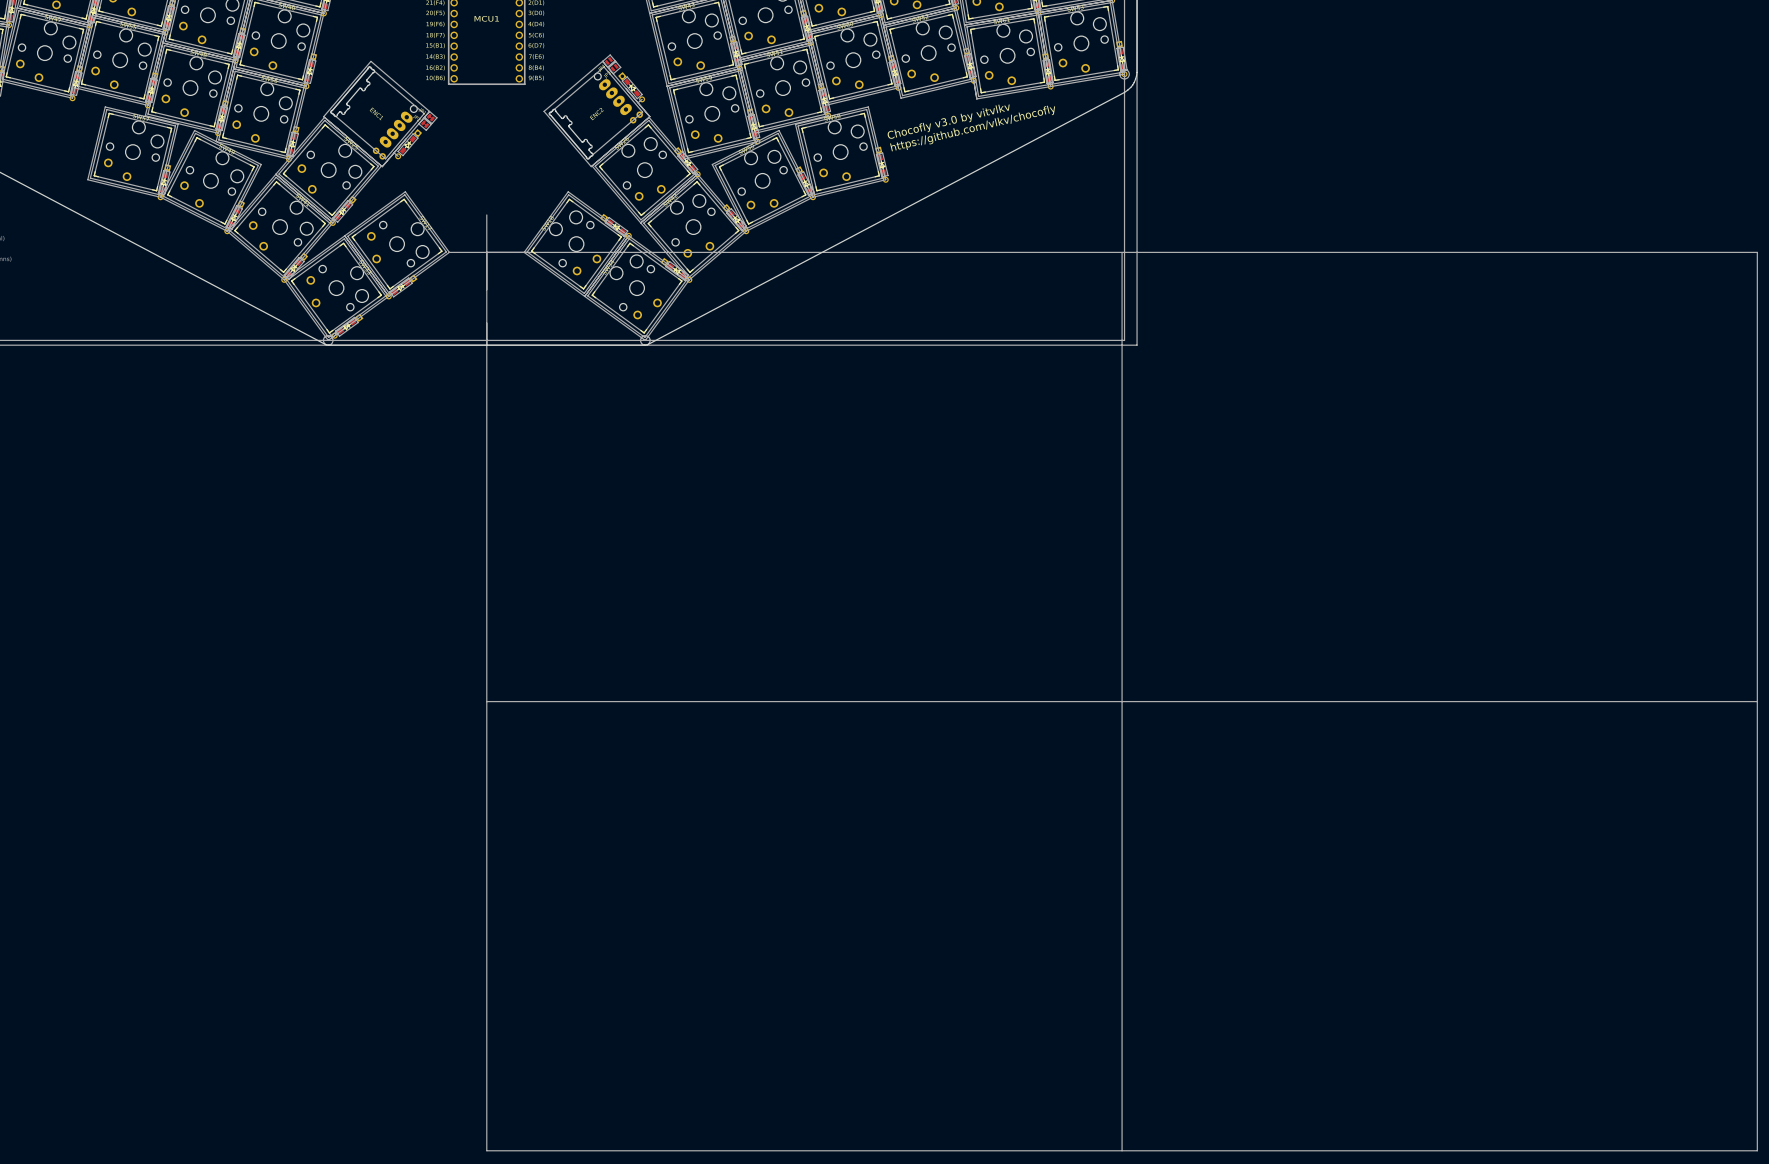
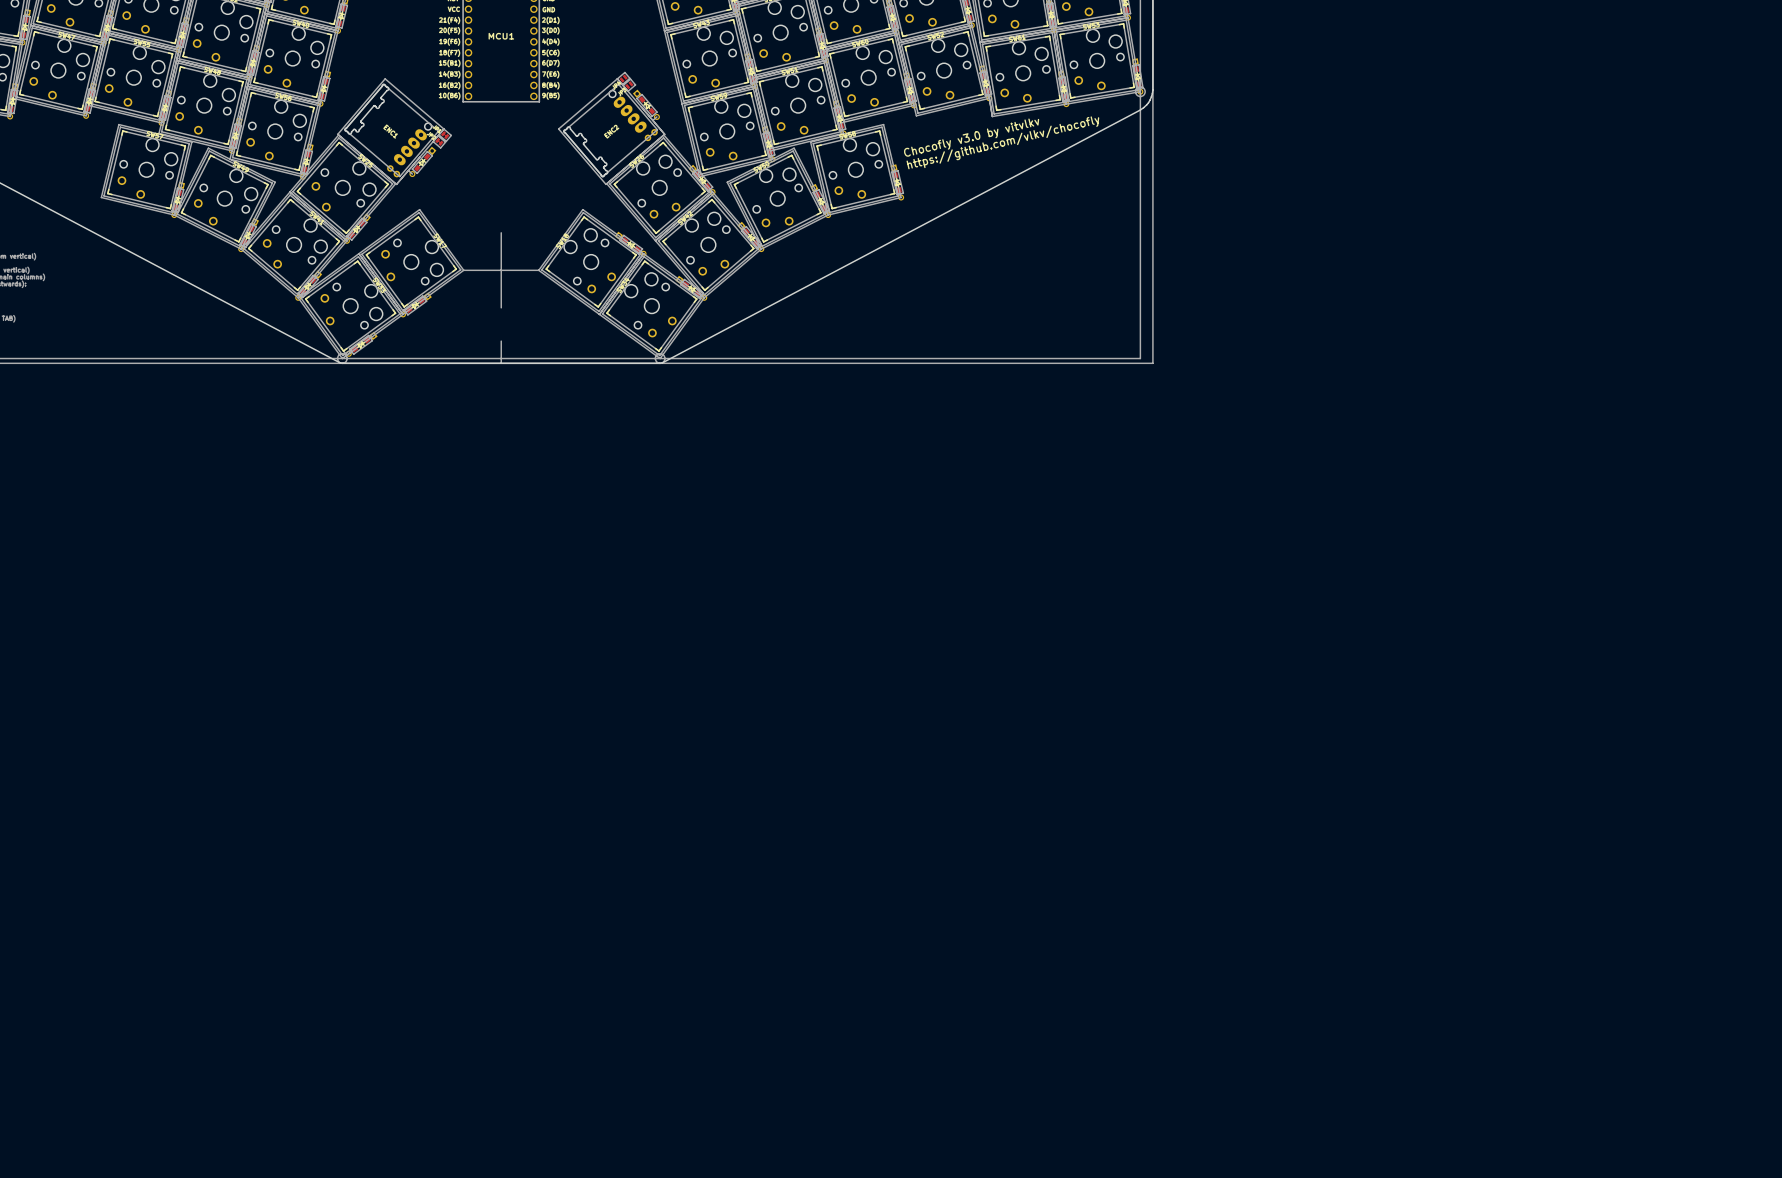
line: (486, 252) (1757, 252) (1757, 1150) (486, 1150) (486, 252) -> none
line: (1122, 252) (1122, 1150) -> none
line: (486, 701) (1757, 701) -> none

